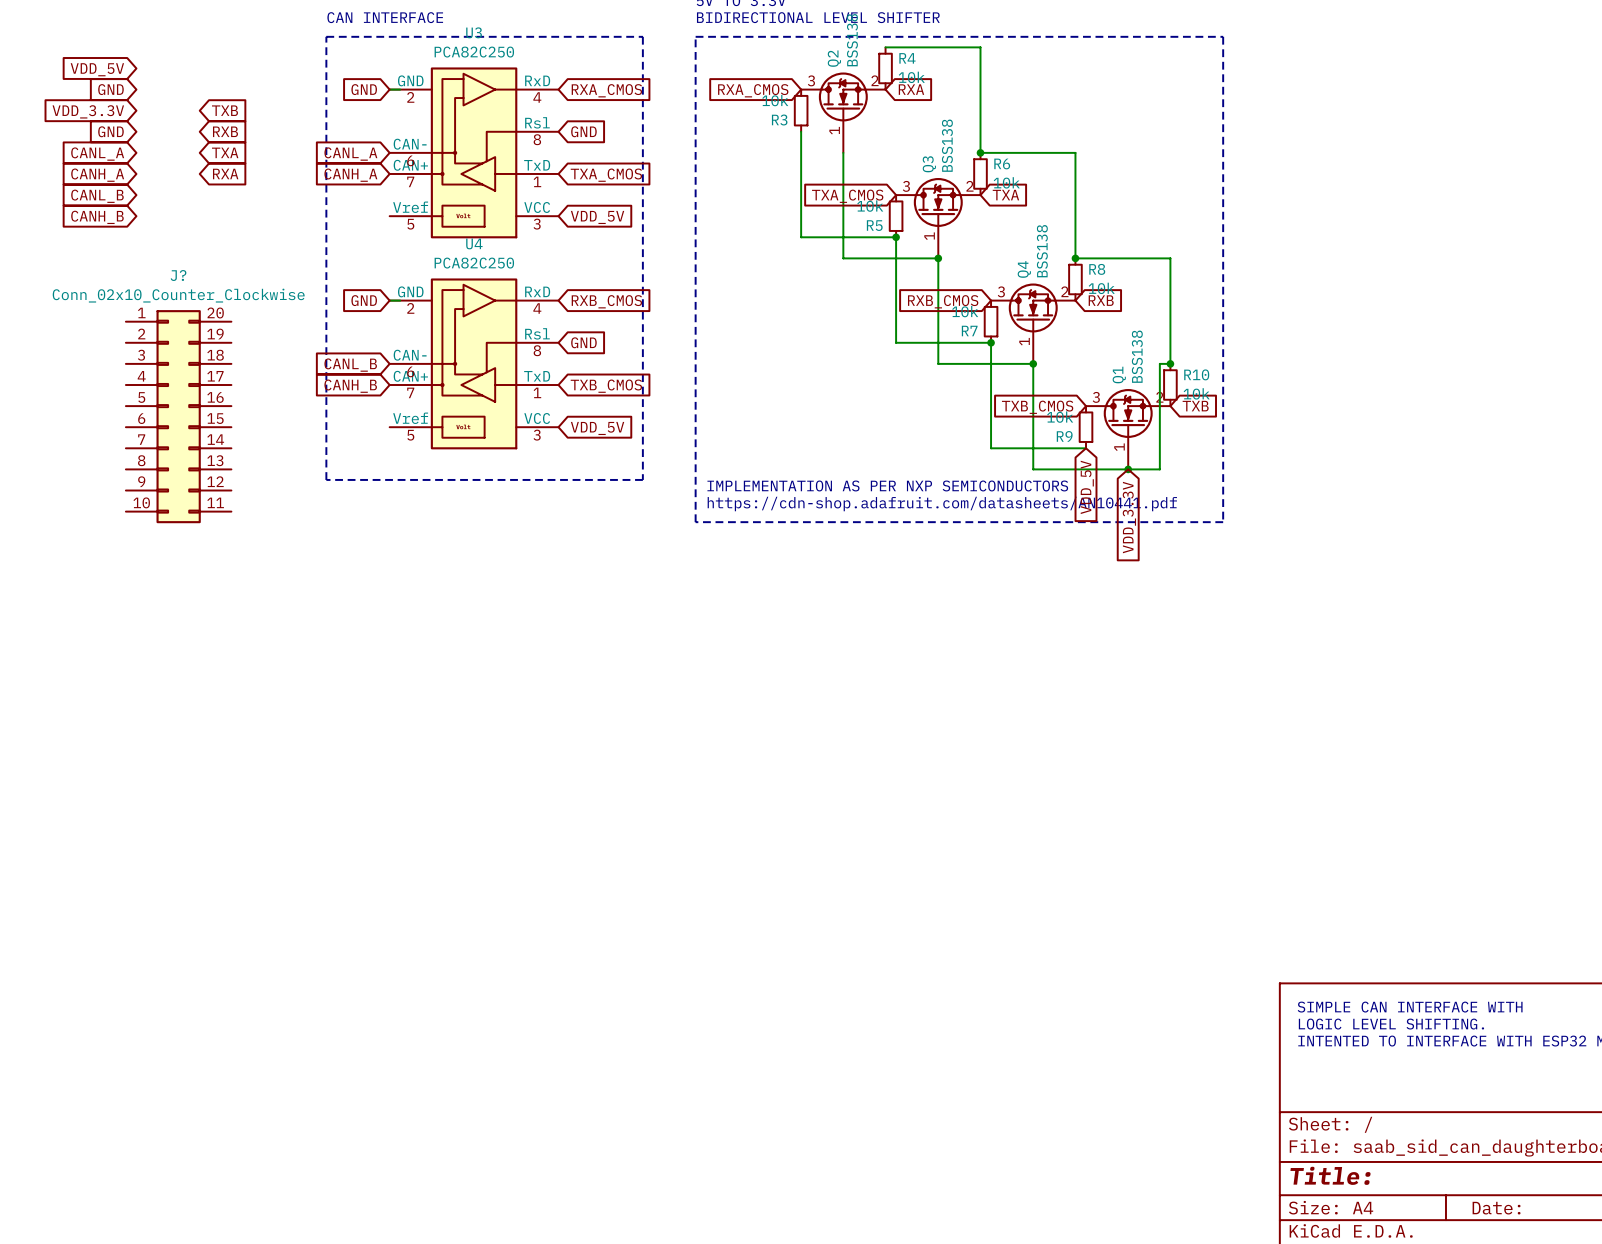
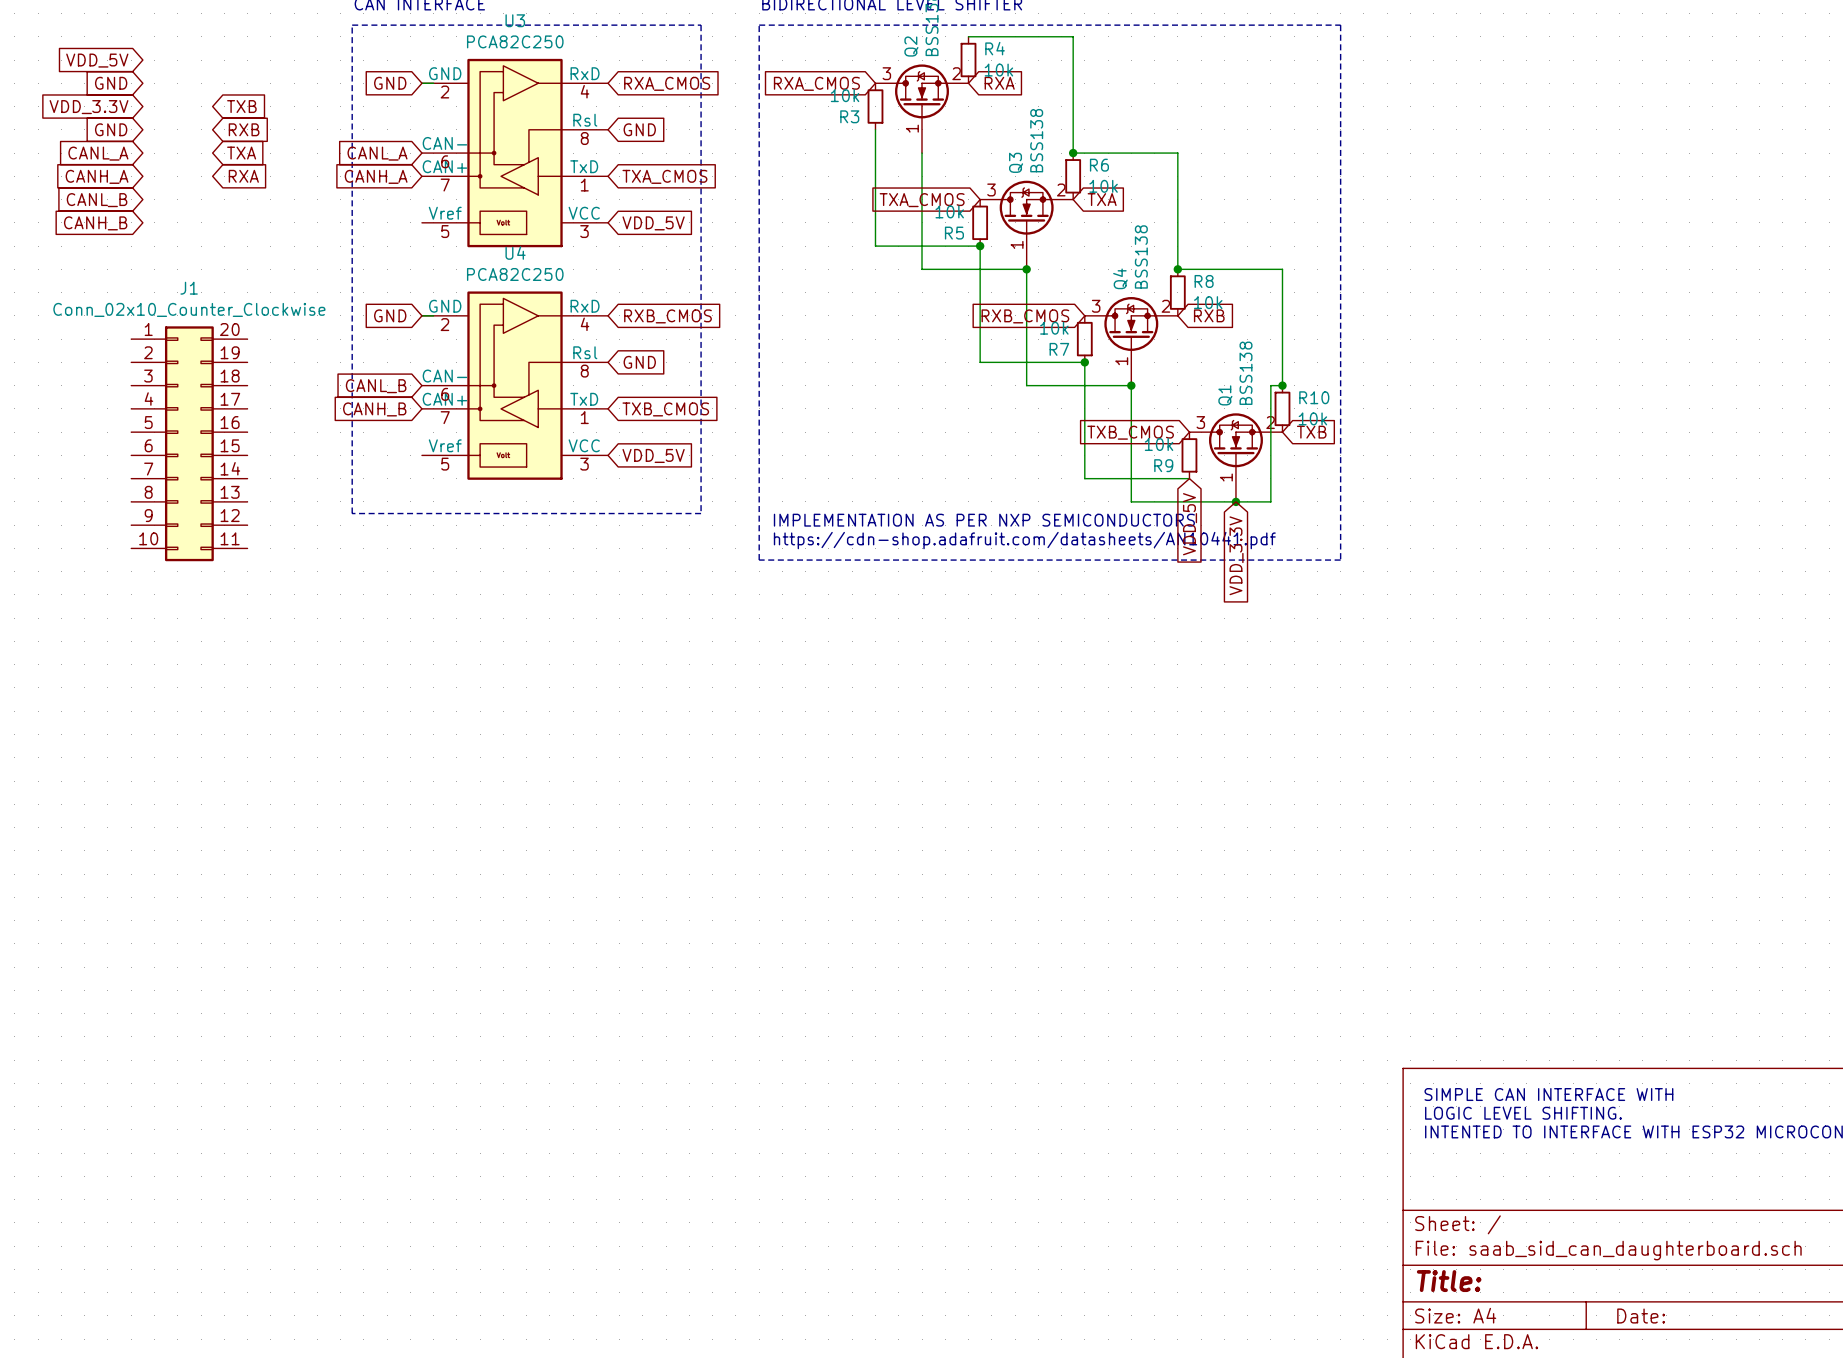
J? name: J? (178, 275) -> J1 (189, 288)

